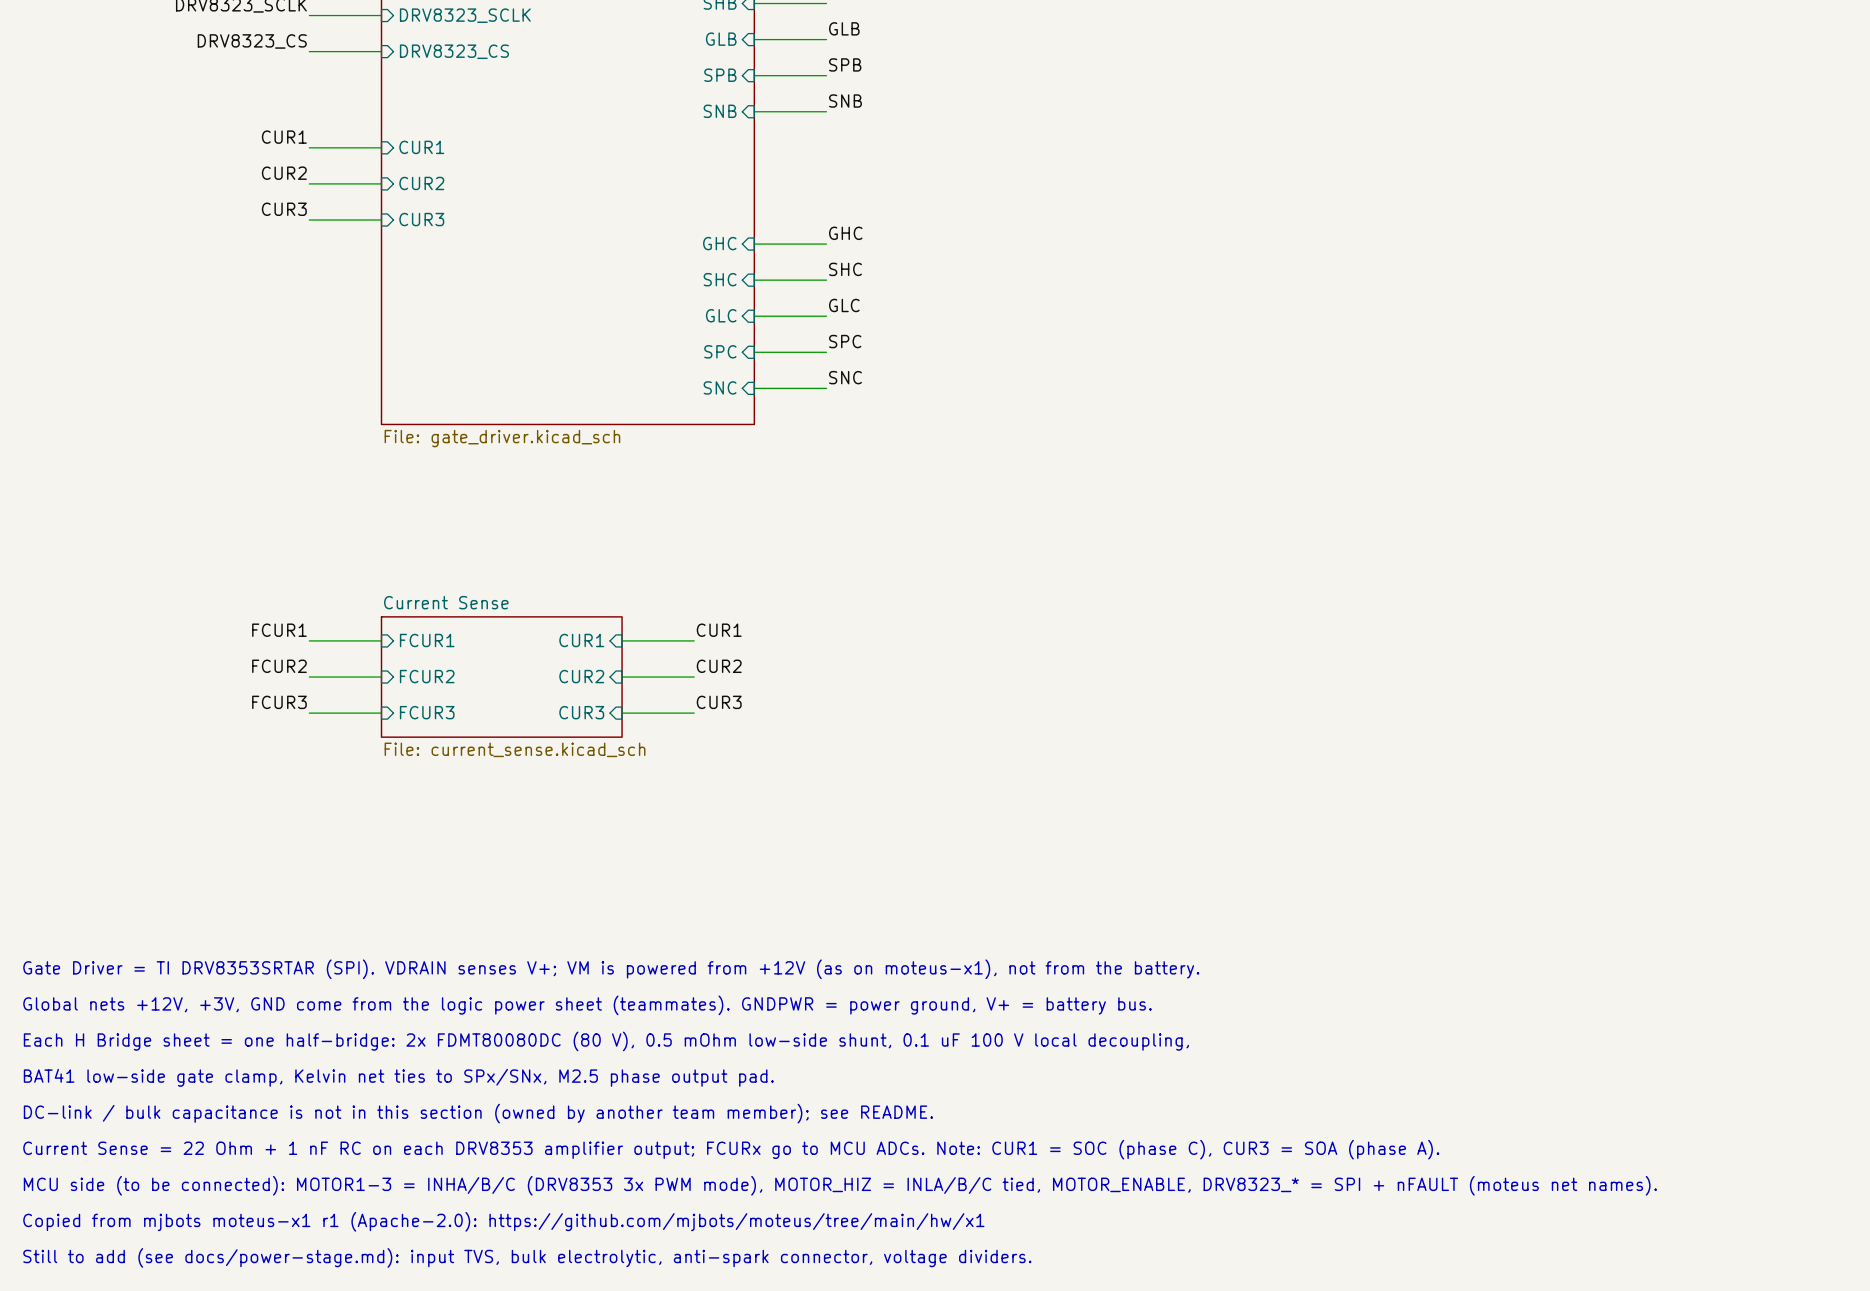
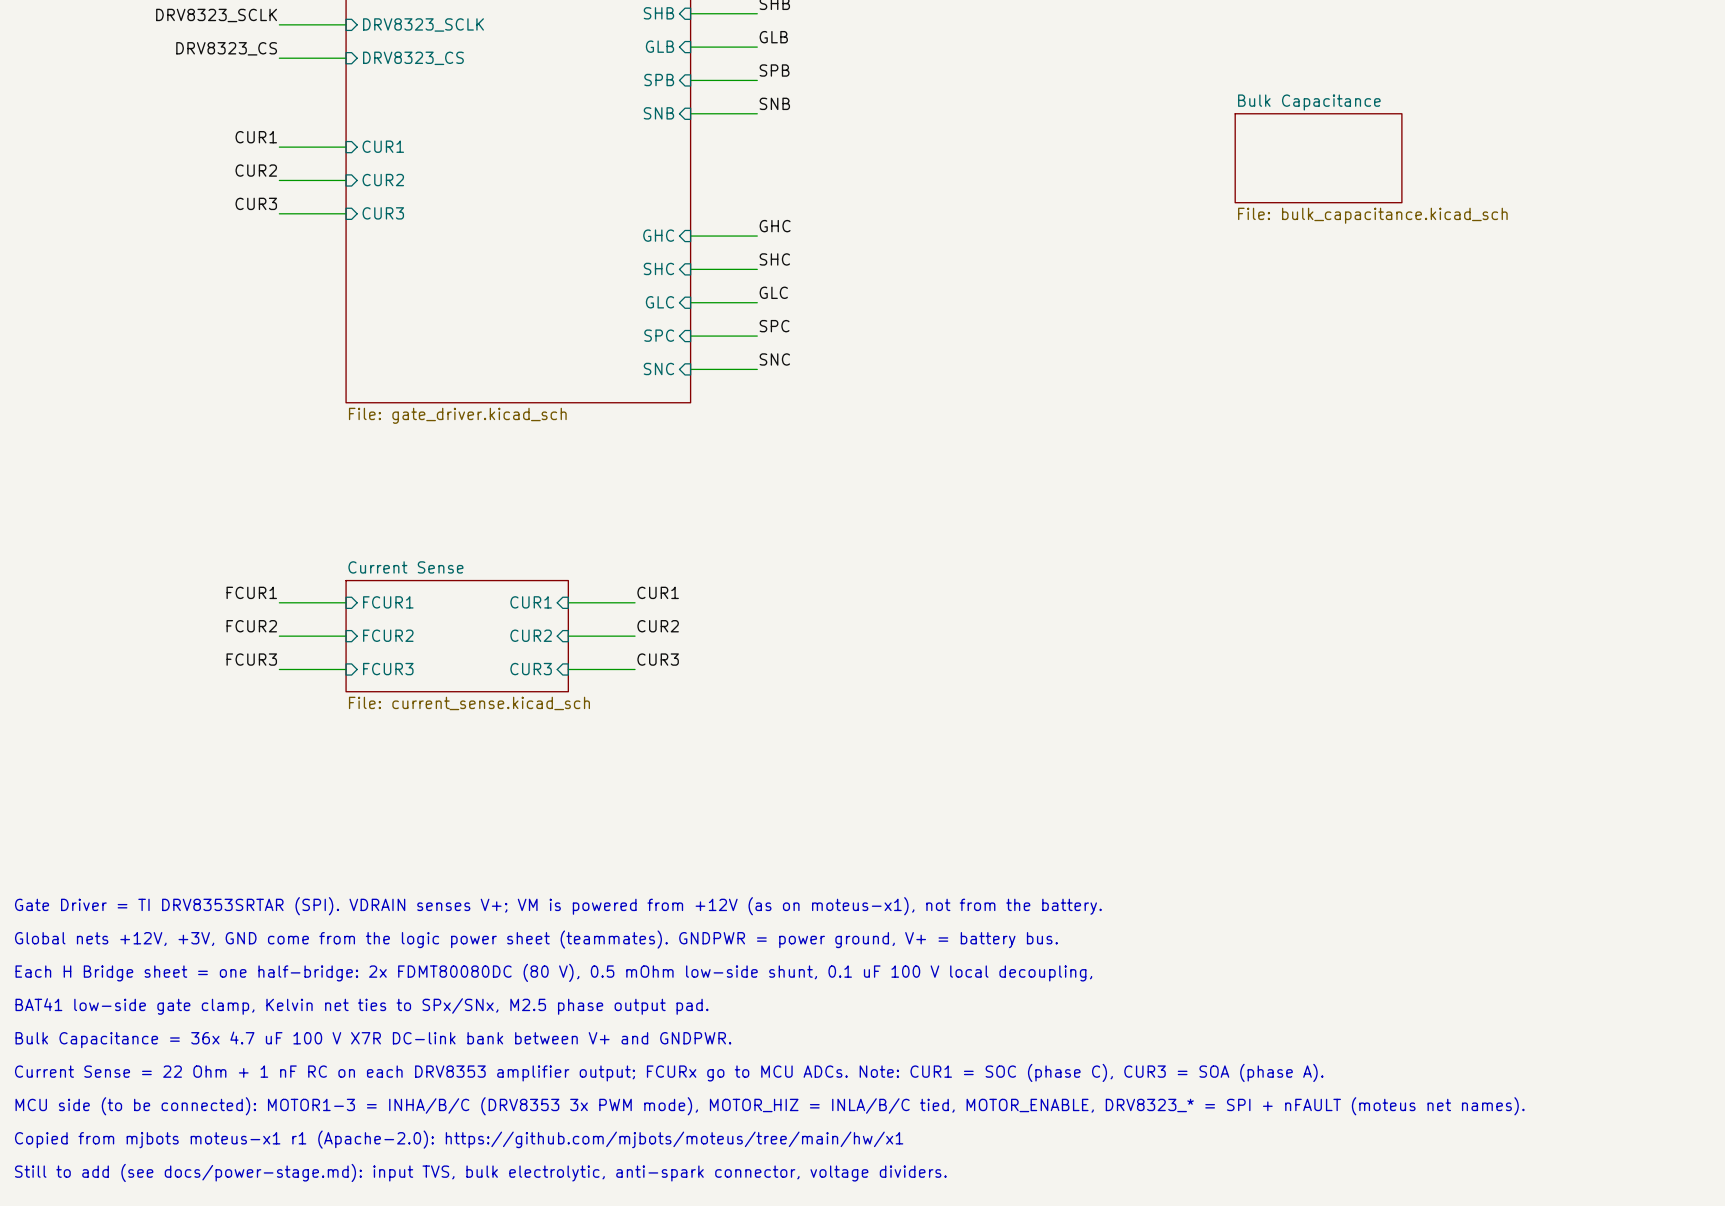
sheet Bulk Capacitance: none -> File: bulk_capacitance.kicad_sch (1318, 158)
text: DC-link / bulk capacitance is not in this section (owned by another team member); see README. (478, 1113) -> Bulk Capacitance = 36x 4.7 uF 100 V X7R DC-link bank between V+ and GNDPWR. (373, 1039)

